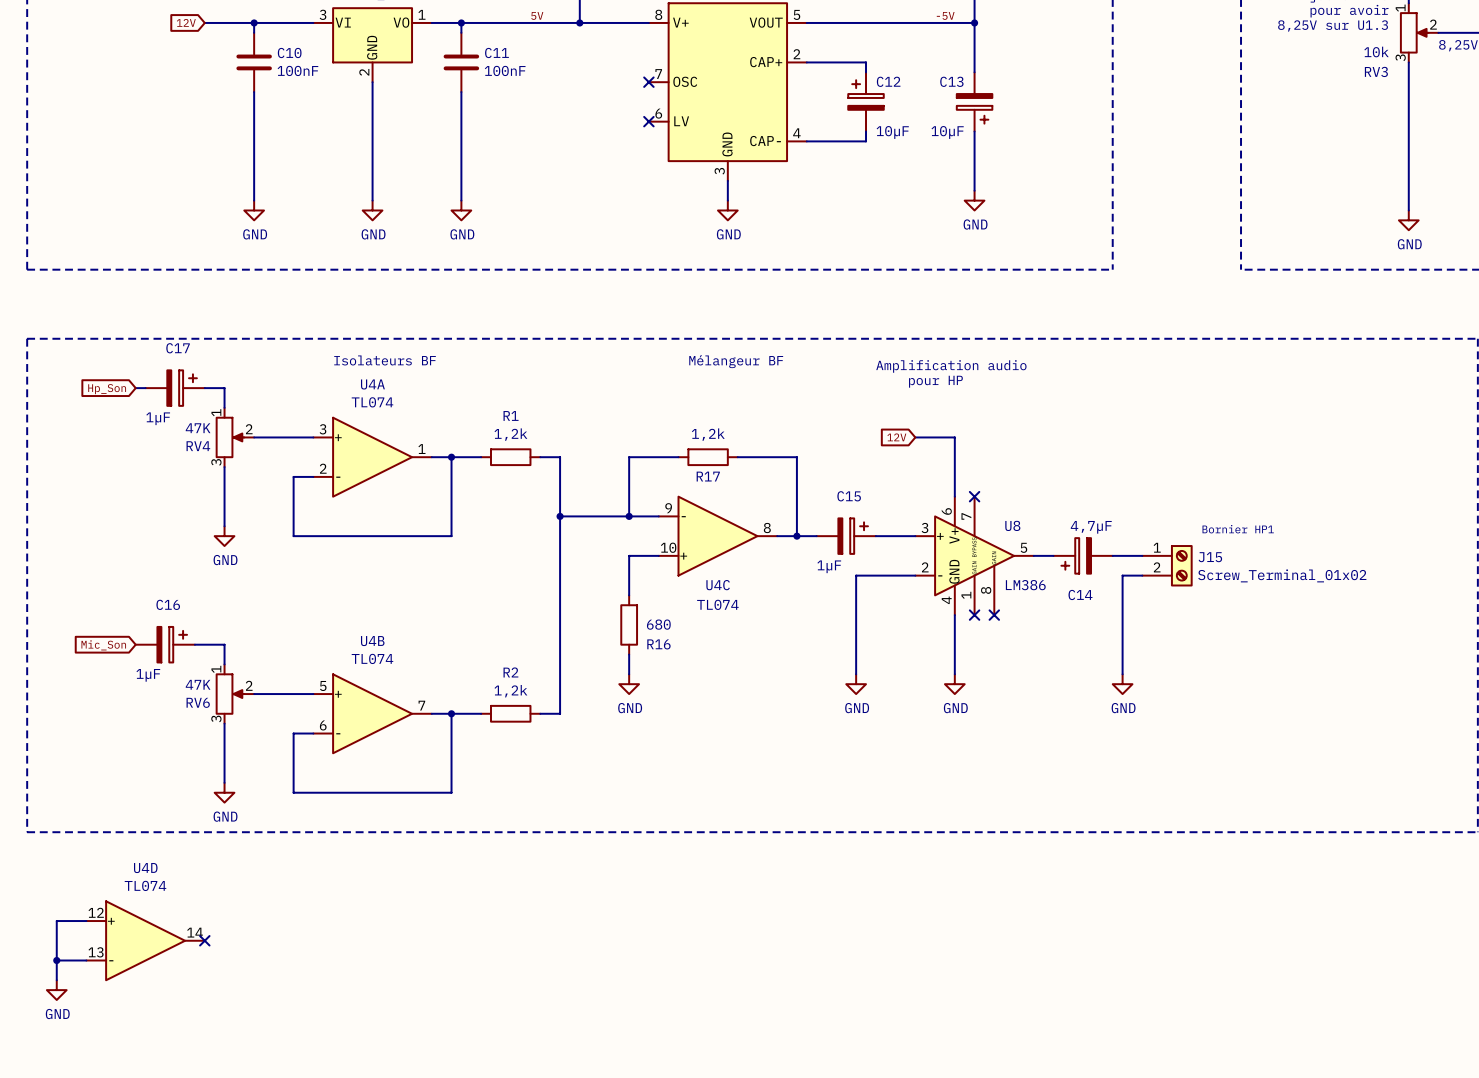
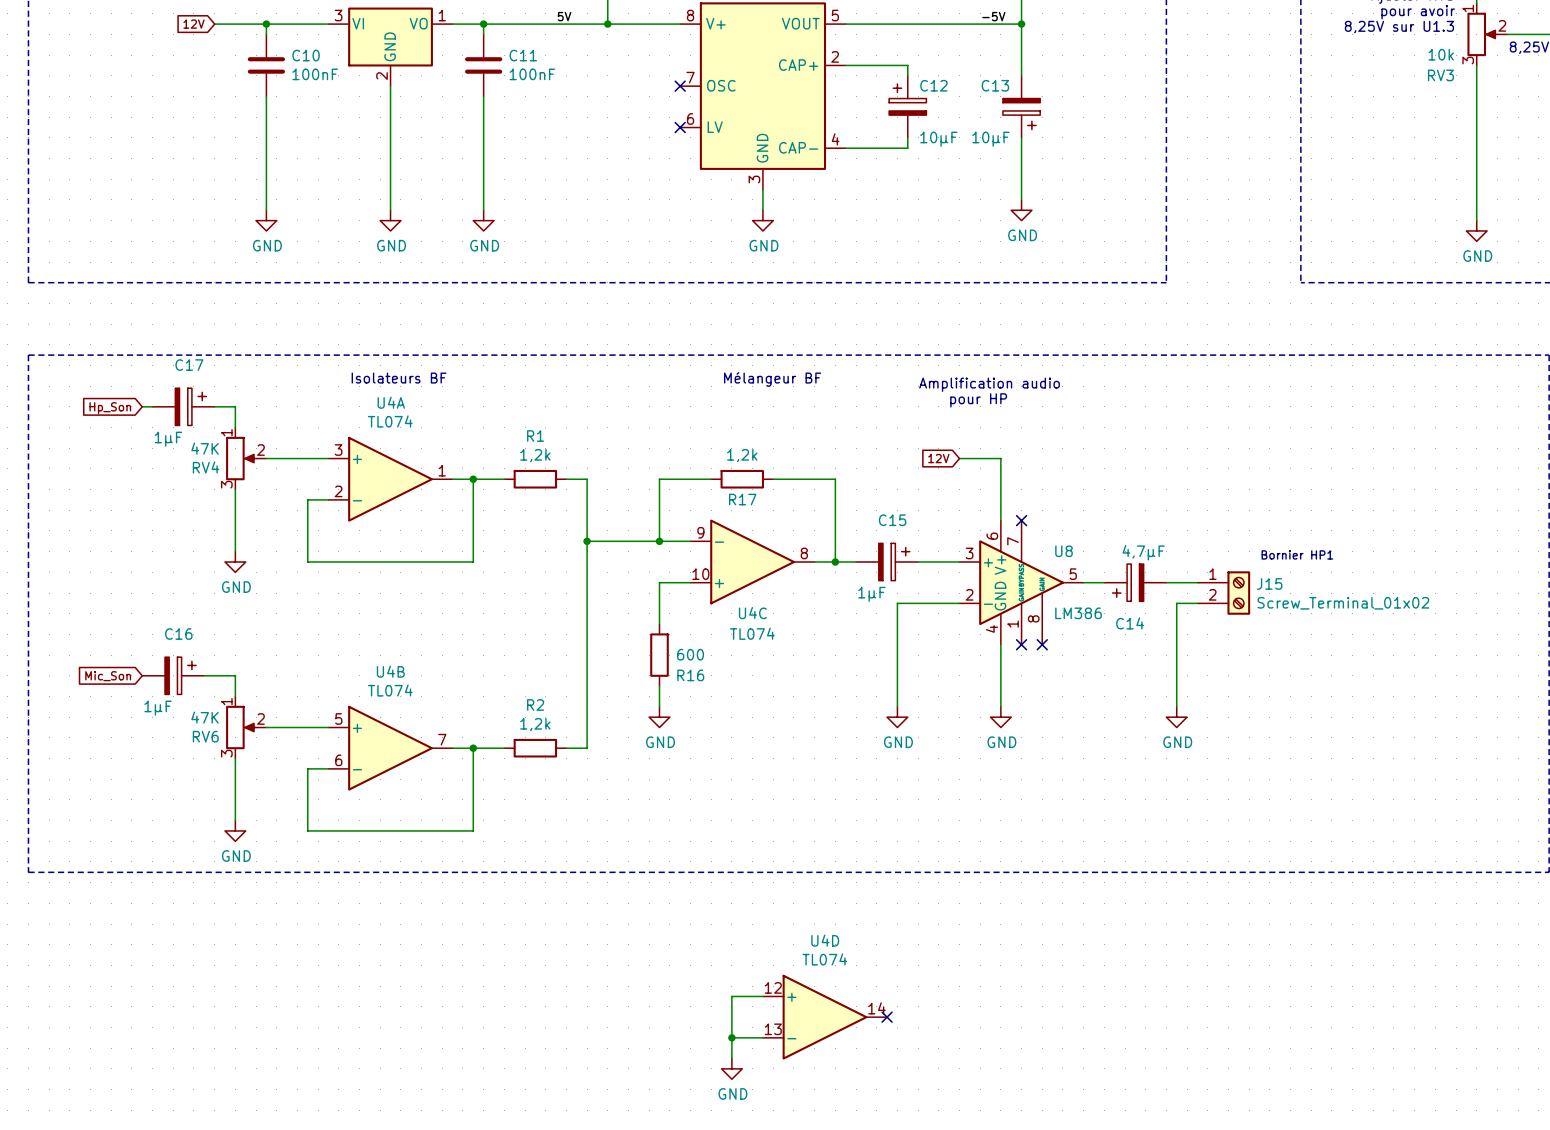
R16 value: 680 (658, 624) -> 600 (690, 654)
wire: (86, 921) (56, 921) (56, 980) -> none
U4D position: (145, 940) -> (825, 1017)
no-connect mark: (204, 940) -> none
wire: none -> (762, 996) (731, 996) (731, 1058)
wire: (56, 960) (86, 960) -> none
junction: (56, 960) -> none
no-connect mark: none -> (887, 1017)
power symbol: GND (56, 990) -> none
wire: none -> (731, 1037) (762, 1037)
junction: none -> (731, 1037)
power symbol: none -> GND (731, 1068)

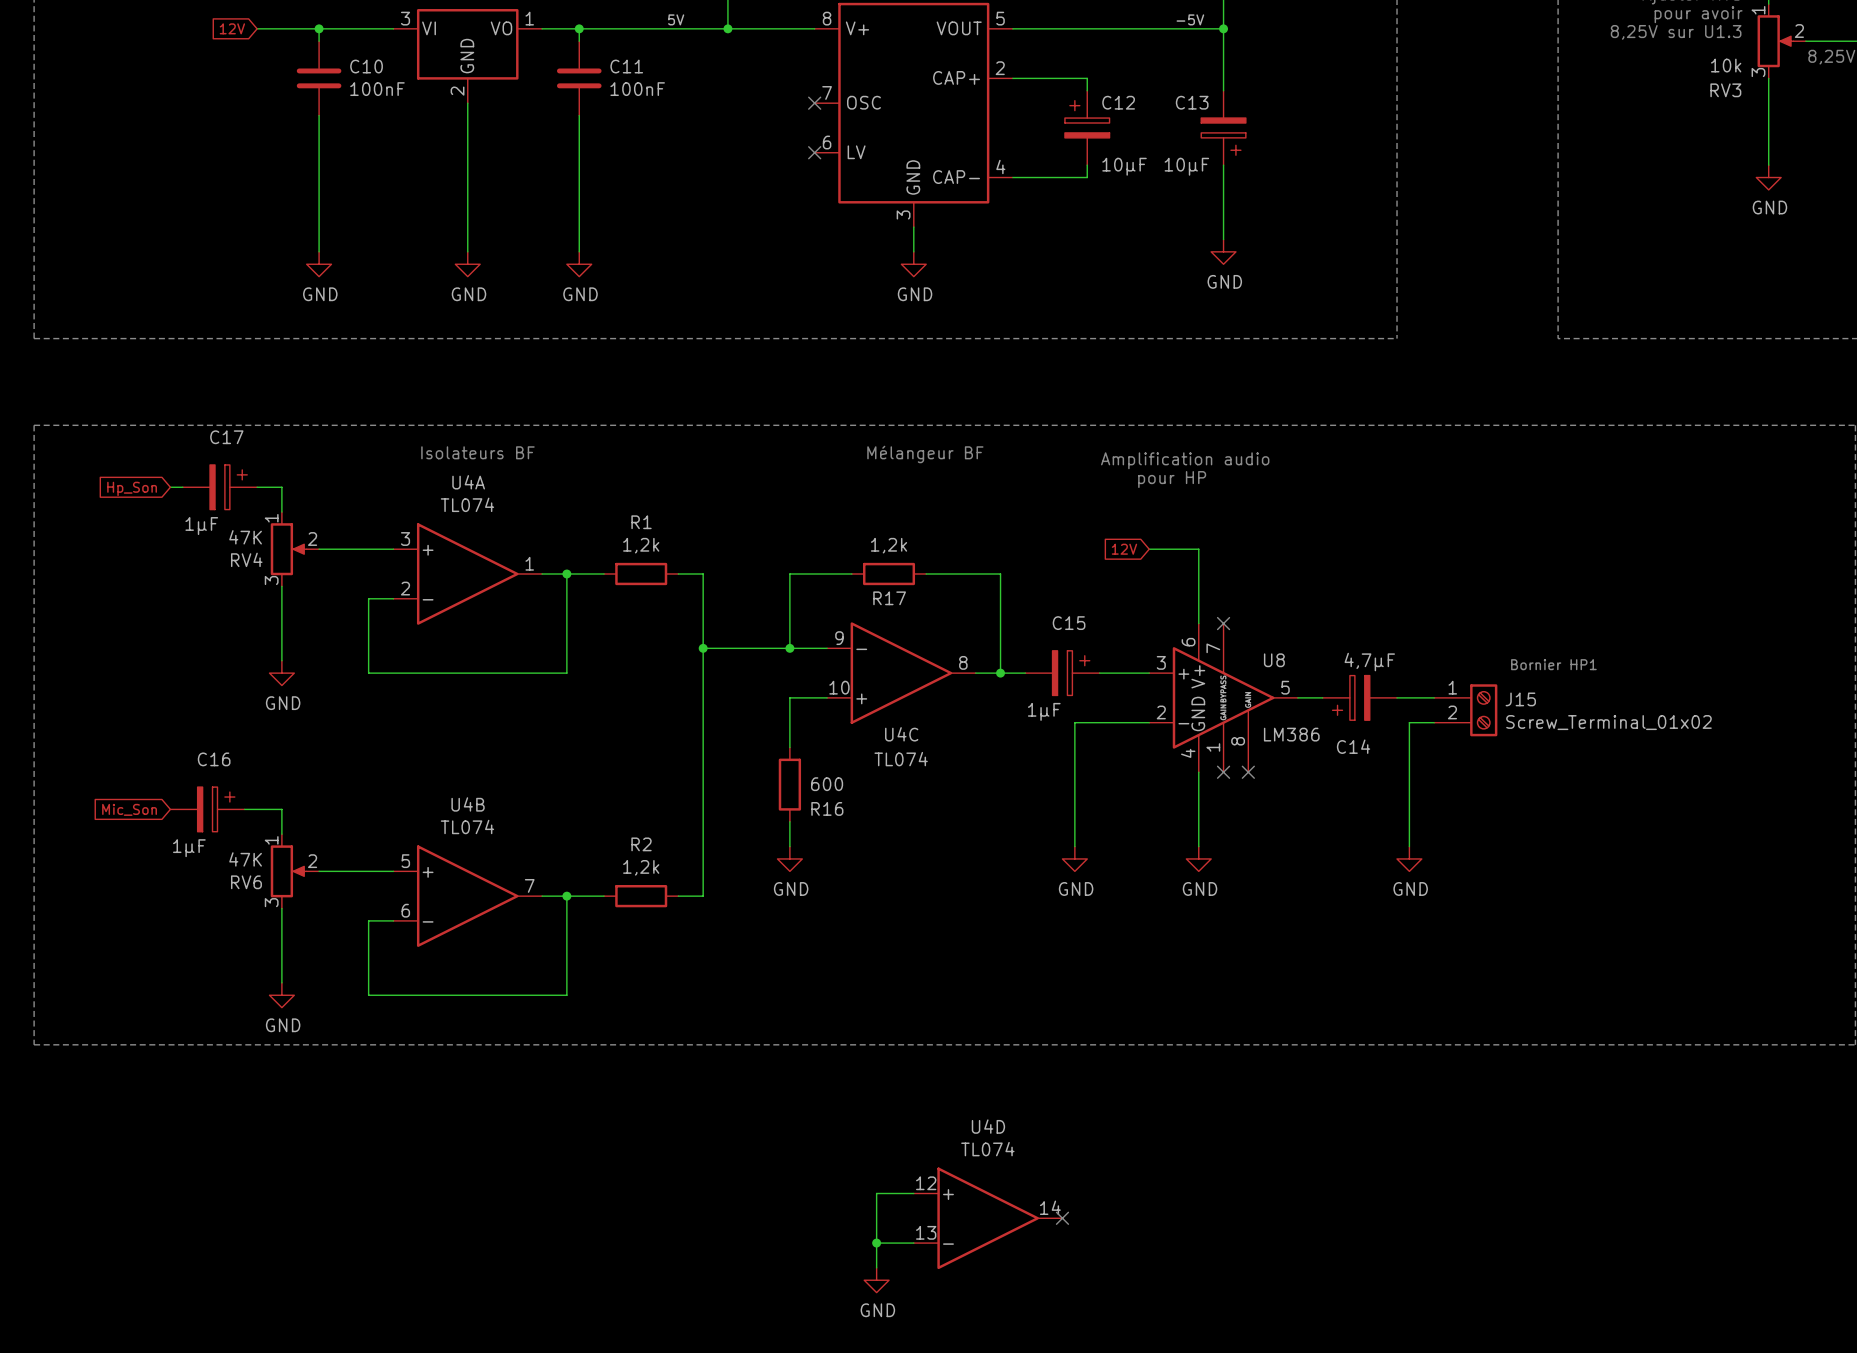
wire: (1476, 137) (1476, 220) -> none
power symbol position: GND (1476, 230) -> GND (1768, 177)

